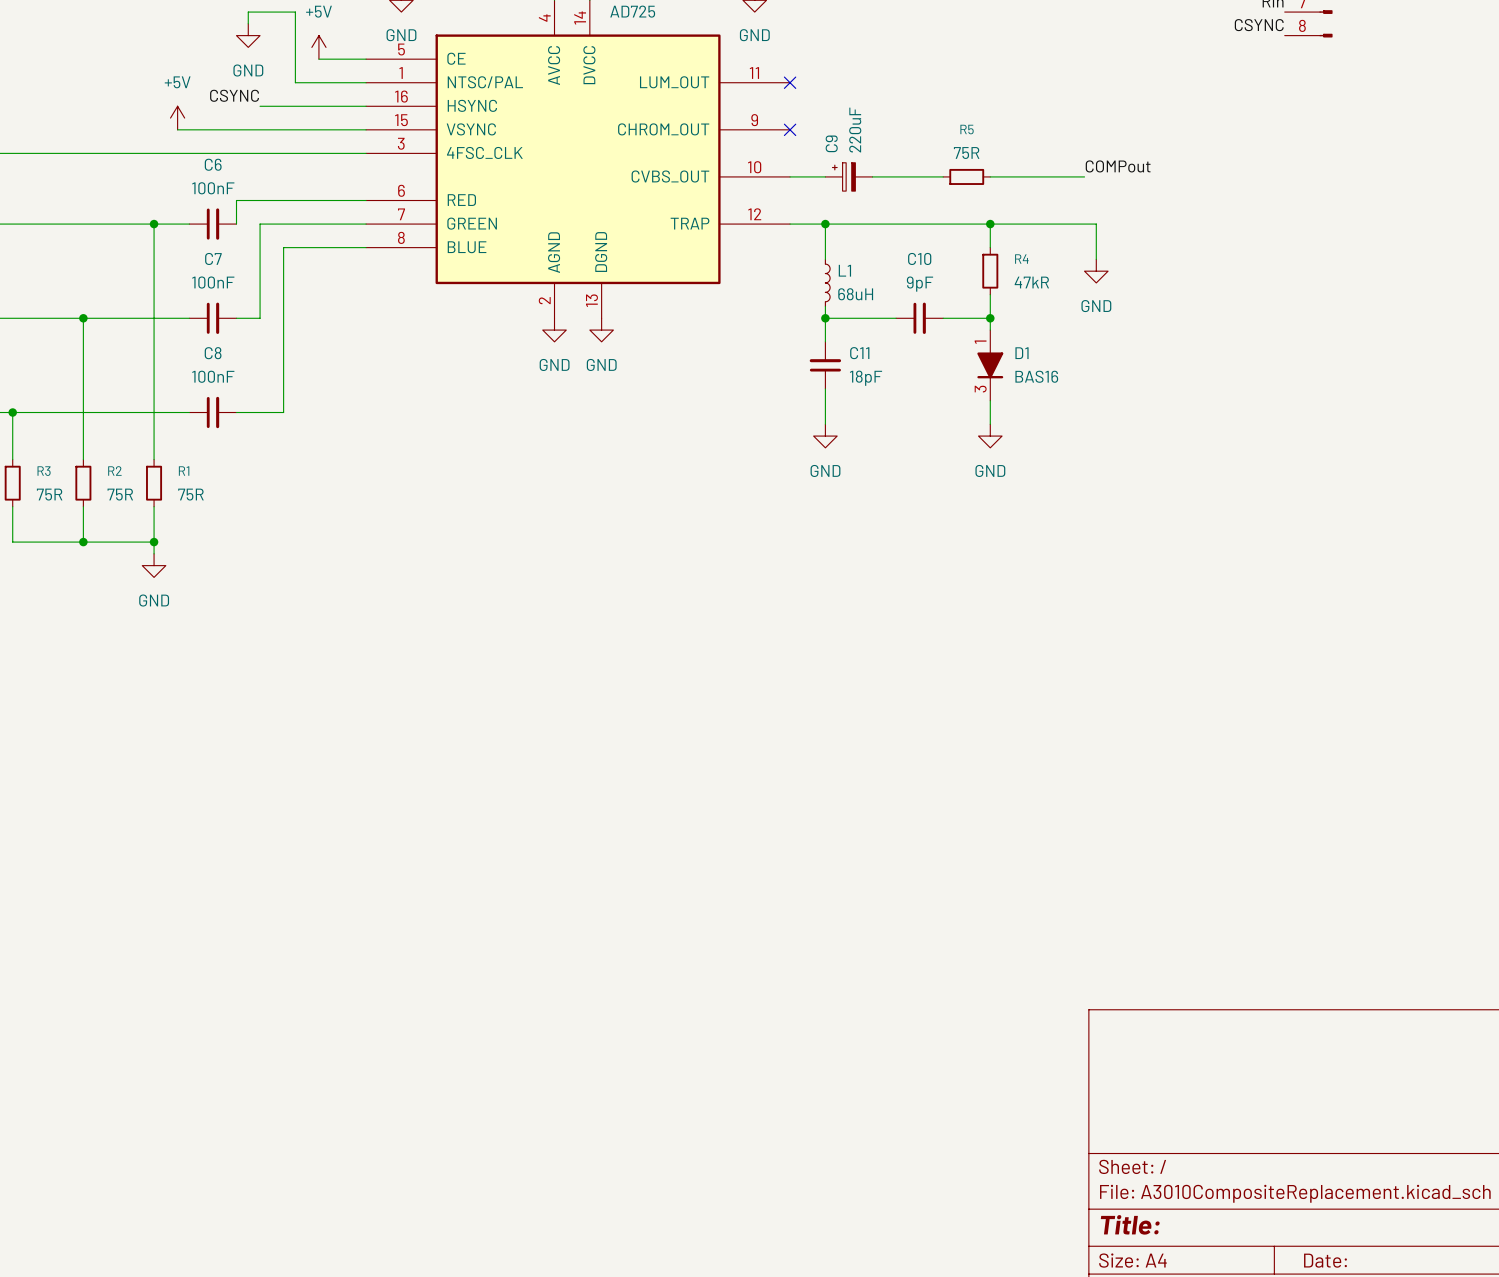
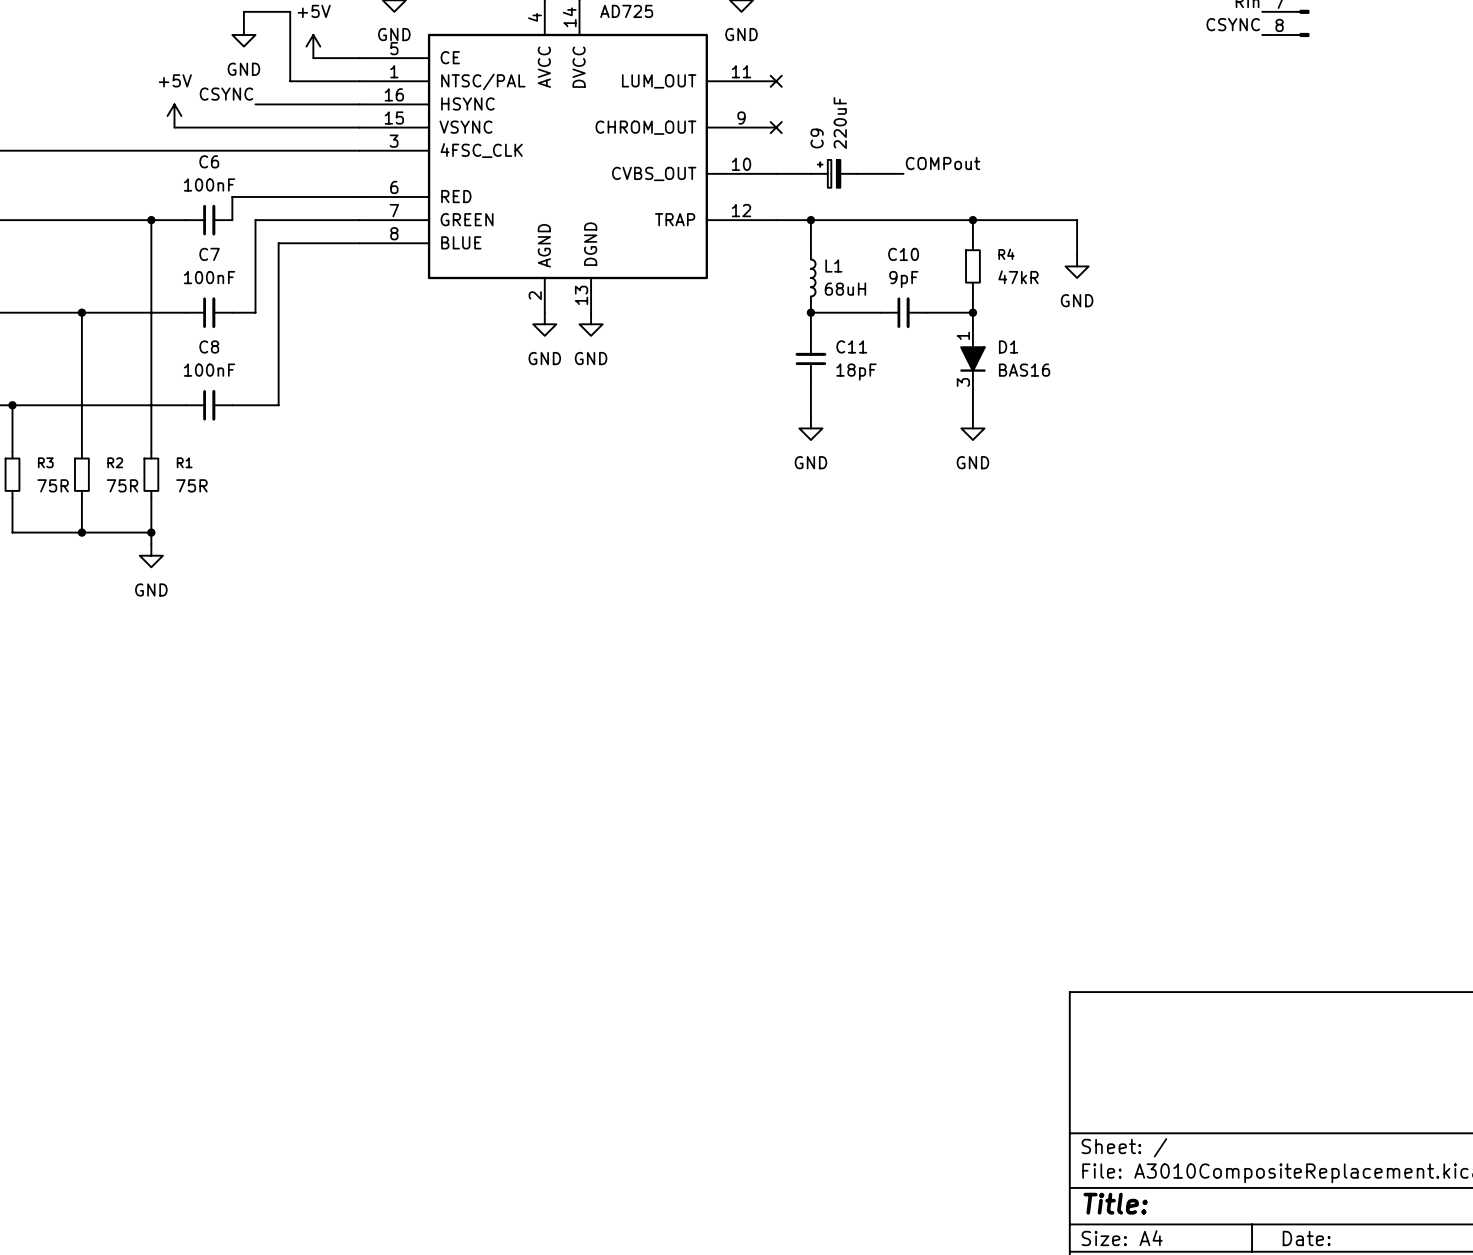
label position: COMPout (1118, 166) -> COMPout (943, 163)
wire: (919, 176) (943, 176) -> none
R5: 75R (966, 176) -> none
wire: (990, 176) (1084, 176) -> none

